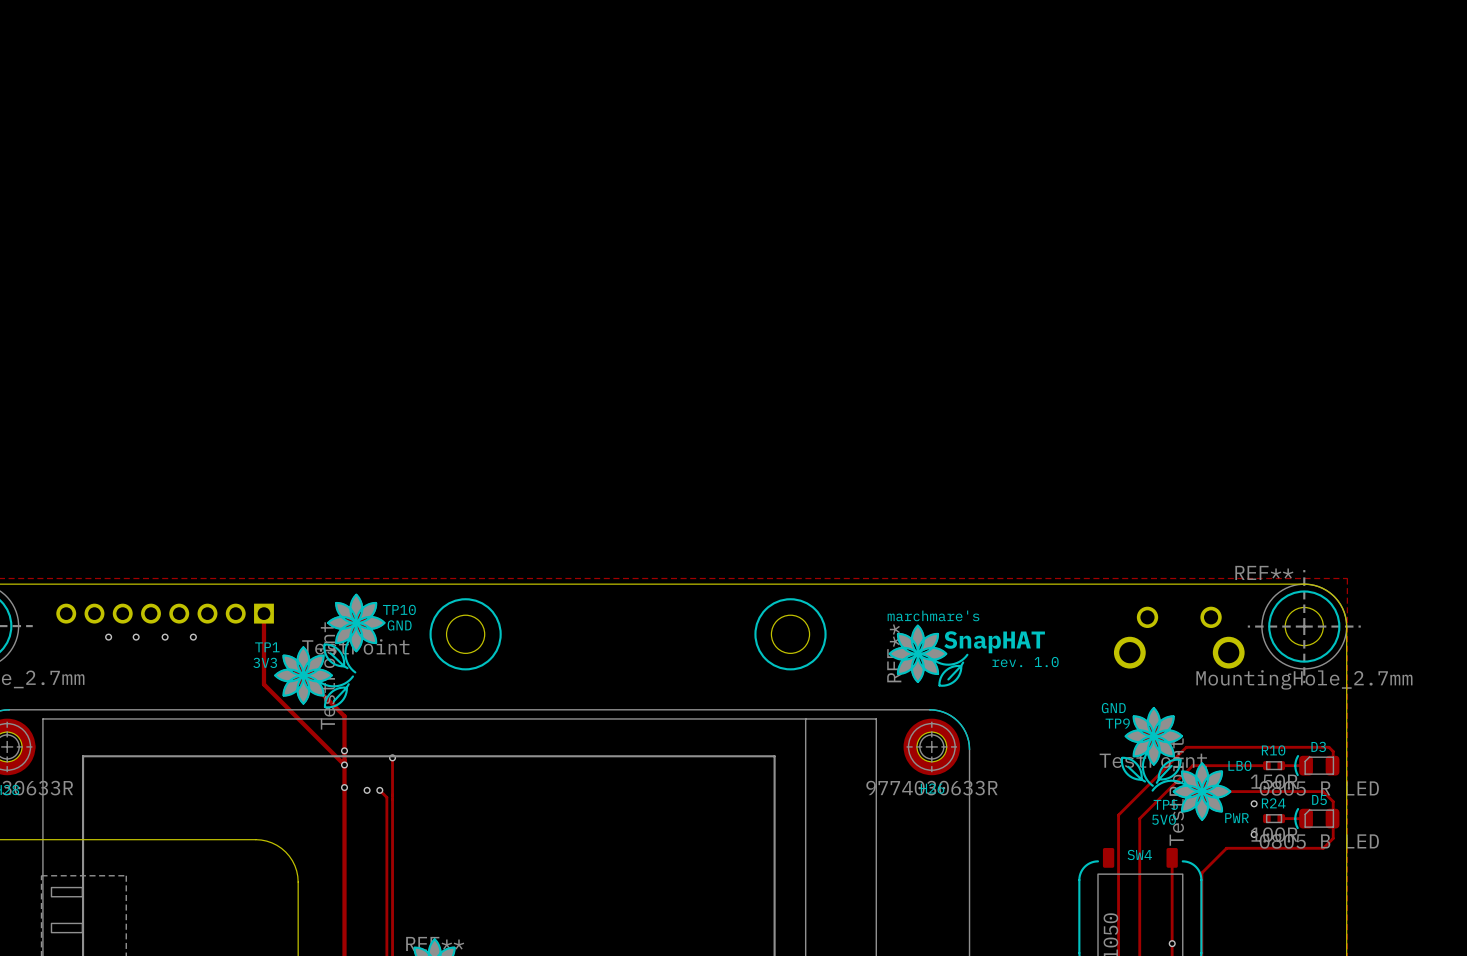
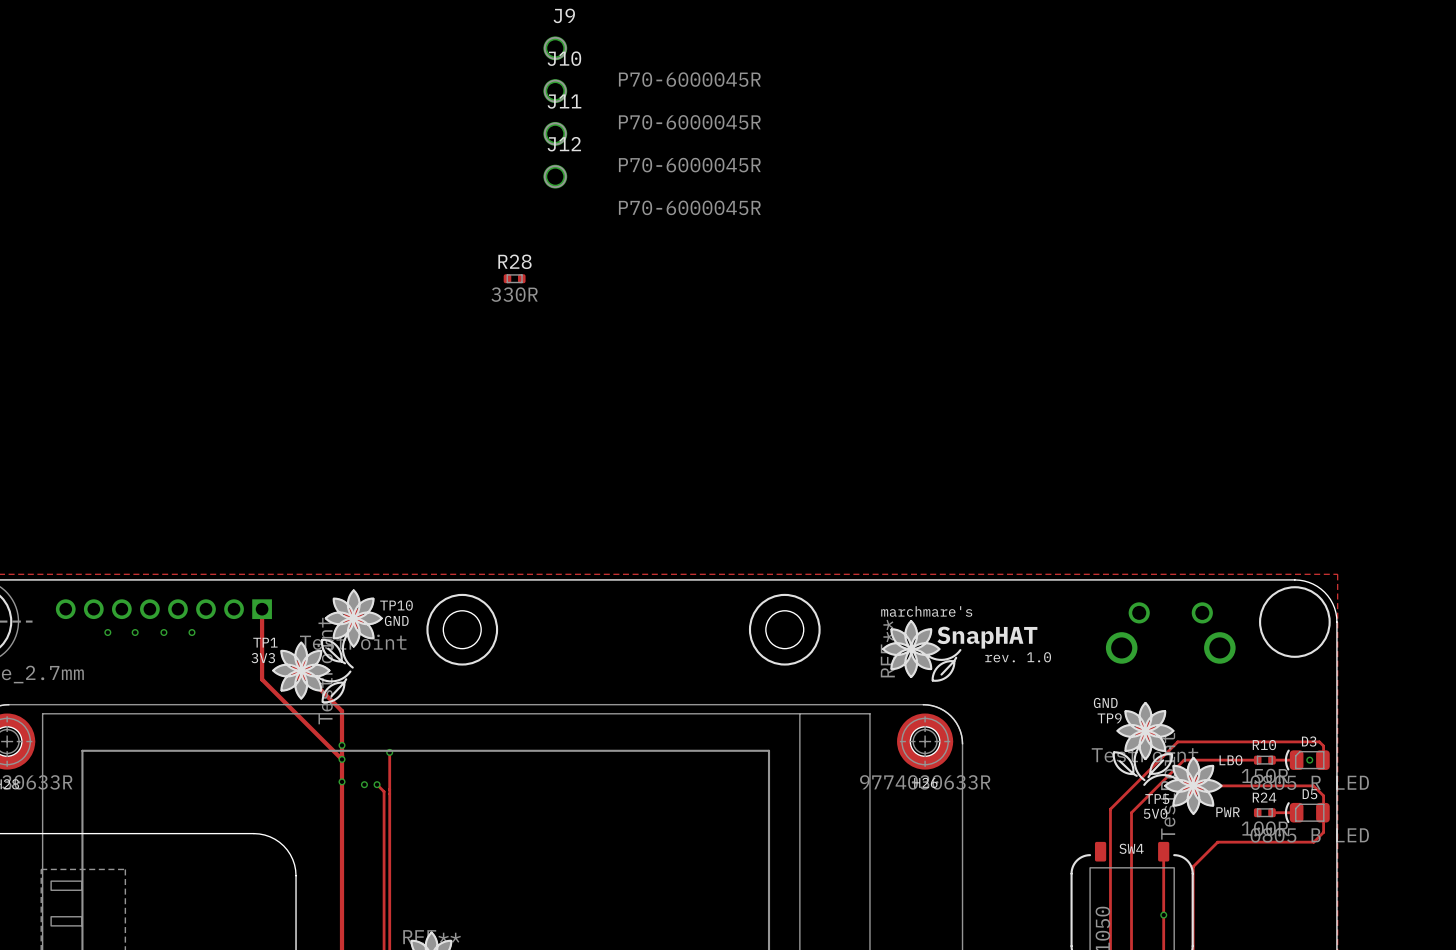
J9: none -> P70-6000045R (555, 48)
J10: none -> P70-6000045R (555, 91)
J11: none -> P70-6000045R (555, 133)
J12: none -> P70-6000045R (555, 176)
R28: none -> 330R (514, 278)
REF**: MountingHole_2.7mm (1304, 626) -> none
via: none -> (1309, 760)
via: (1254, 803) -> none
via: (1254, 834) -> none
via position: (1172, 943) -> (1163, 915)

